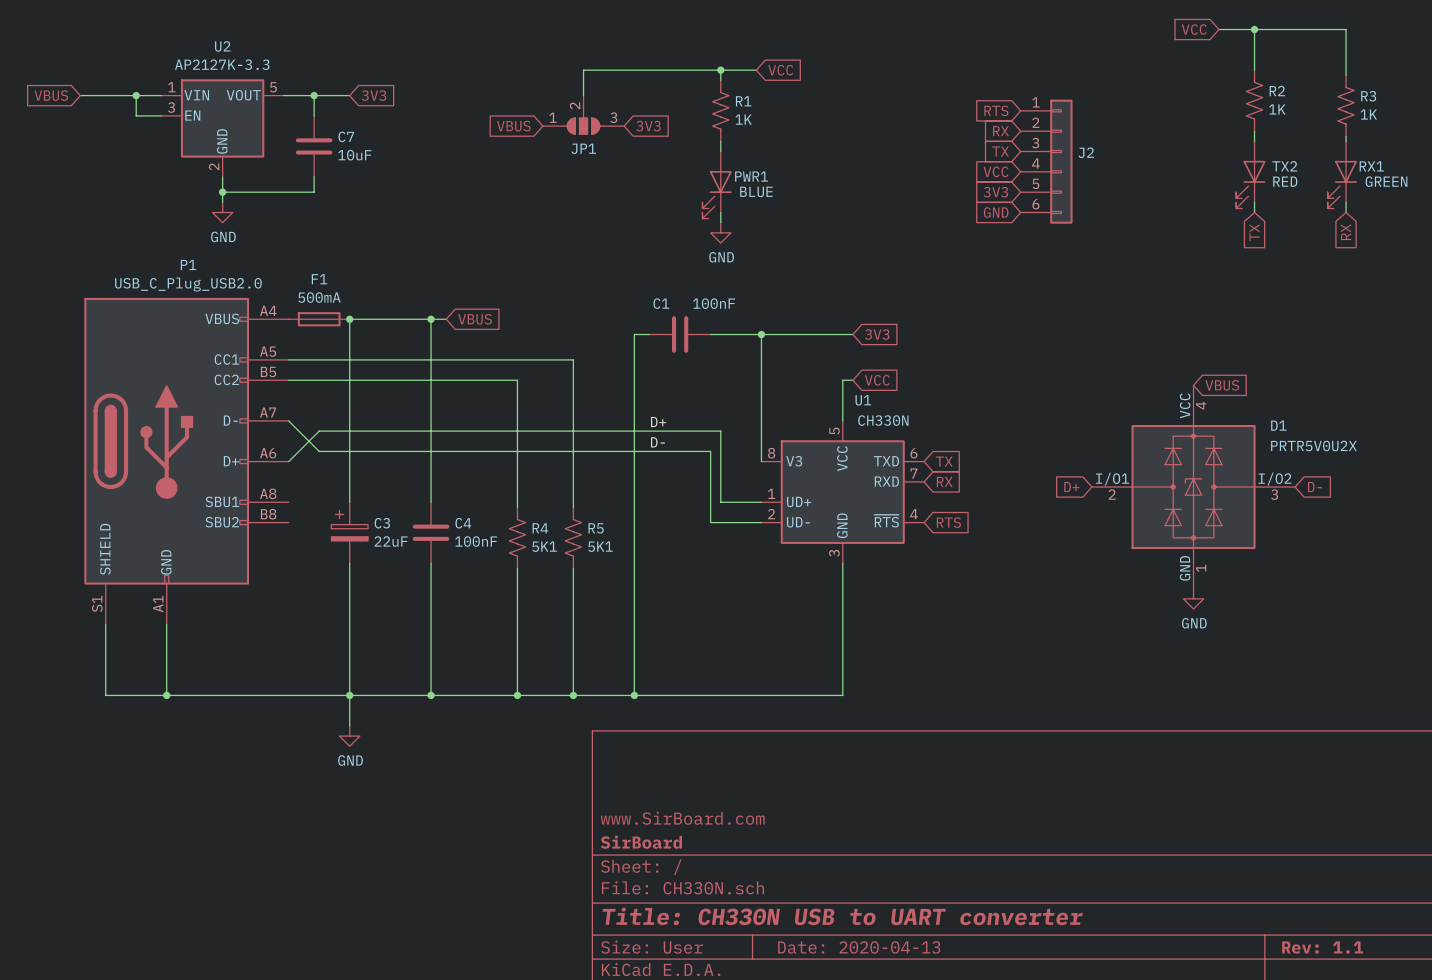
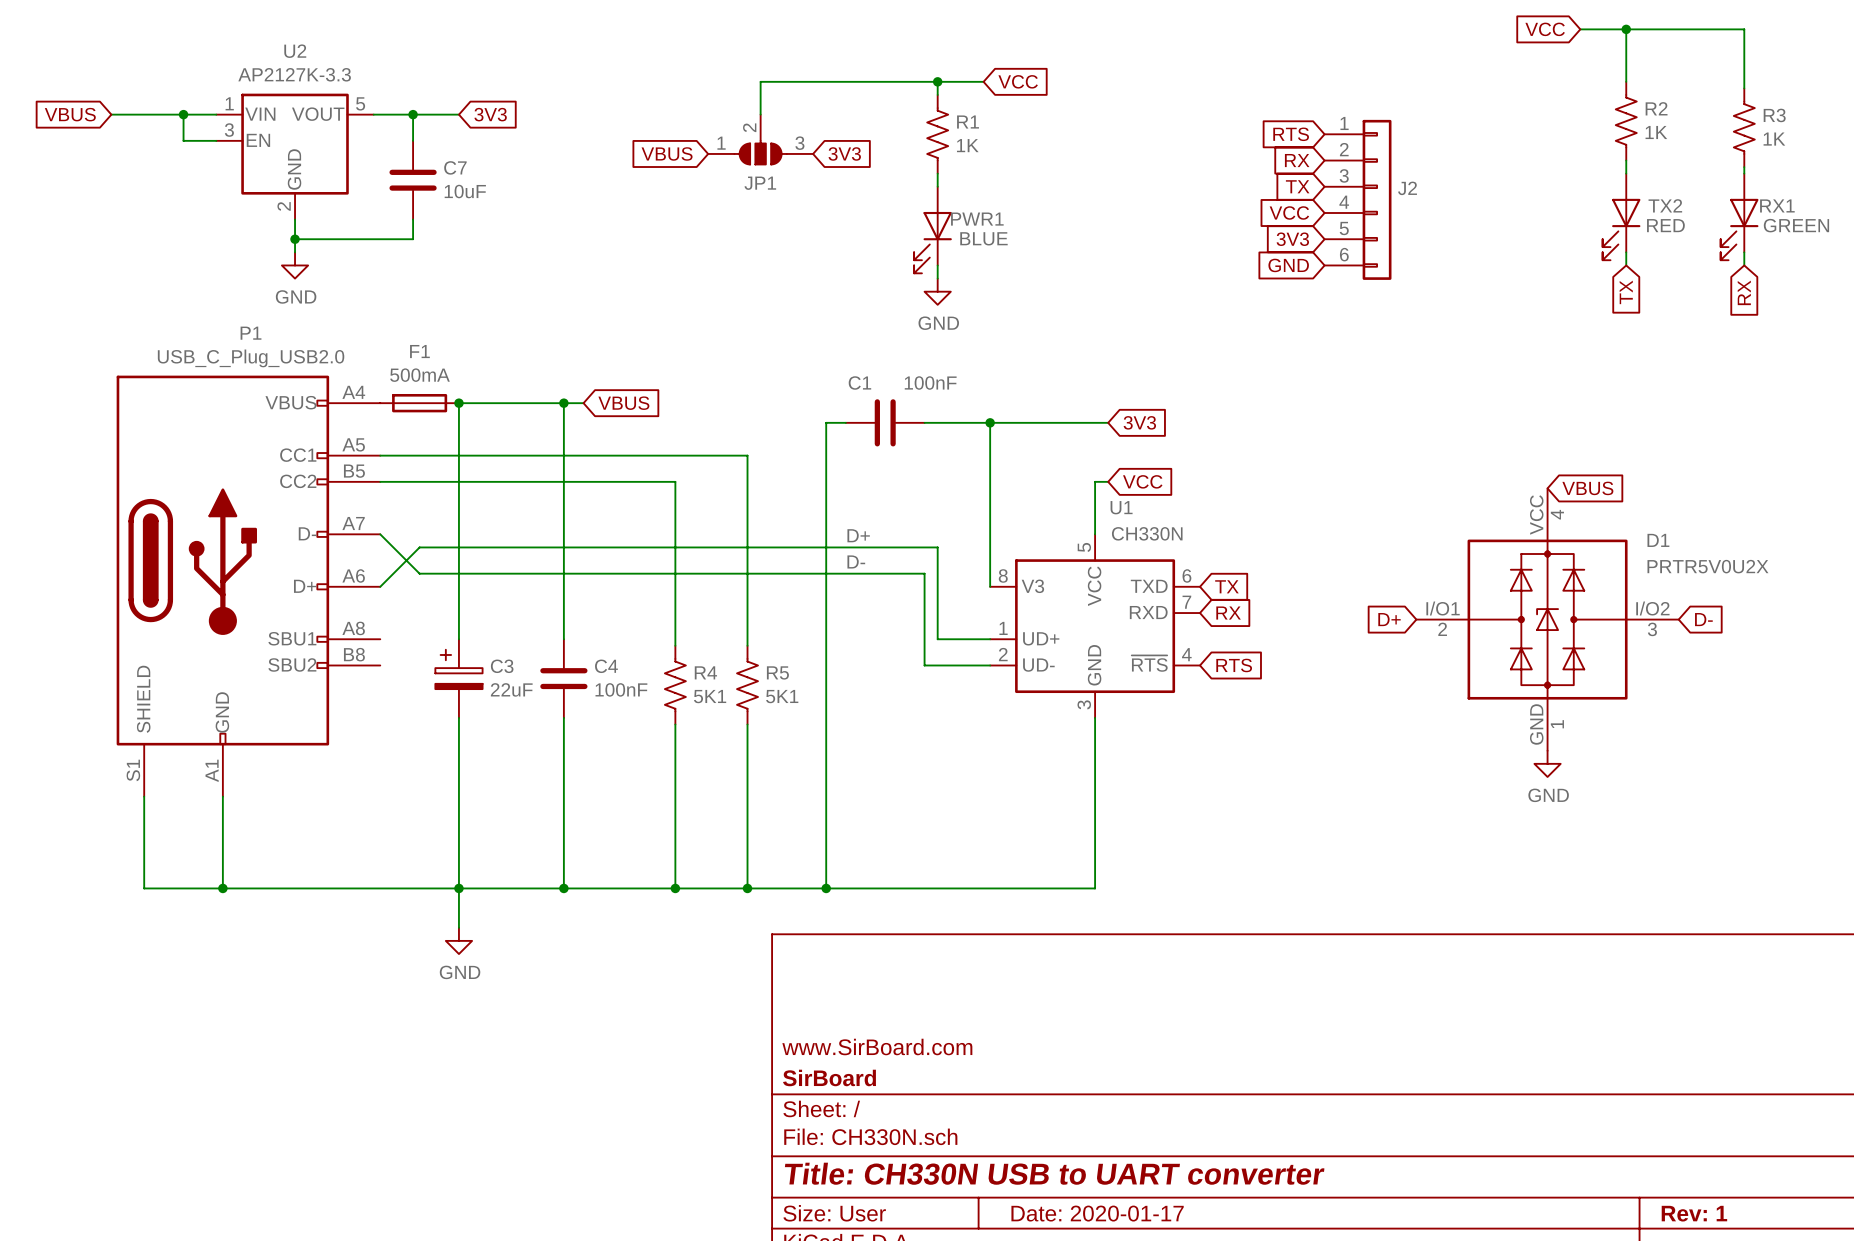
title block: Date: 2020-04-13 (859, 947) -> Date: 2020-01-17 (1097, 1213)
title block: Rev: 1.1 (1322, 947) -> Rev: 1 (1694, 1213)

